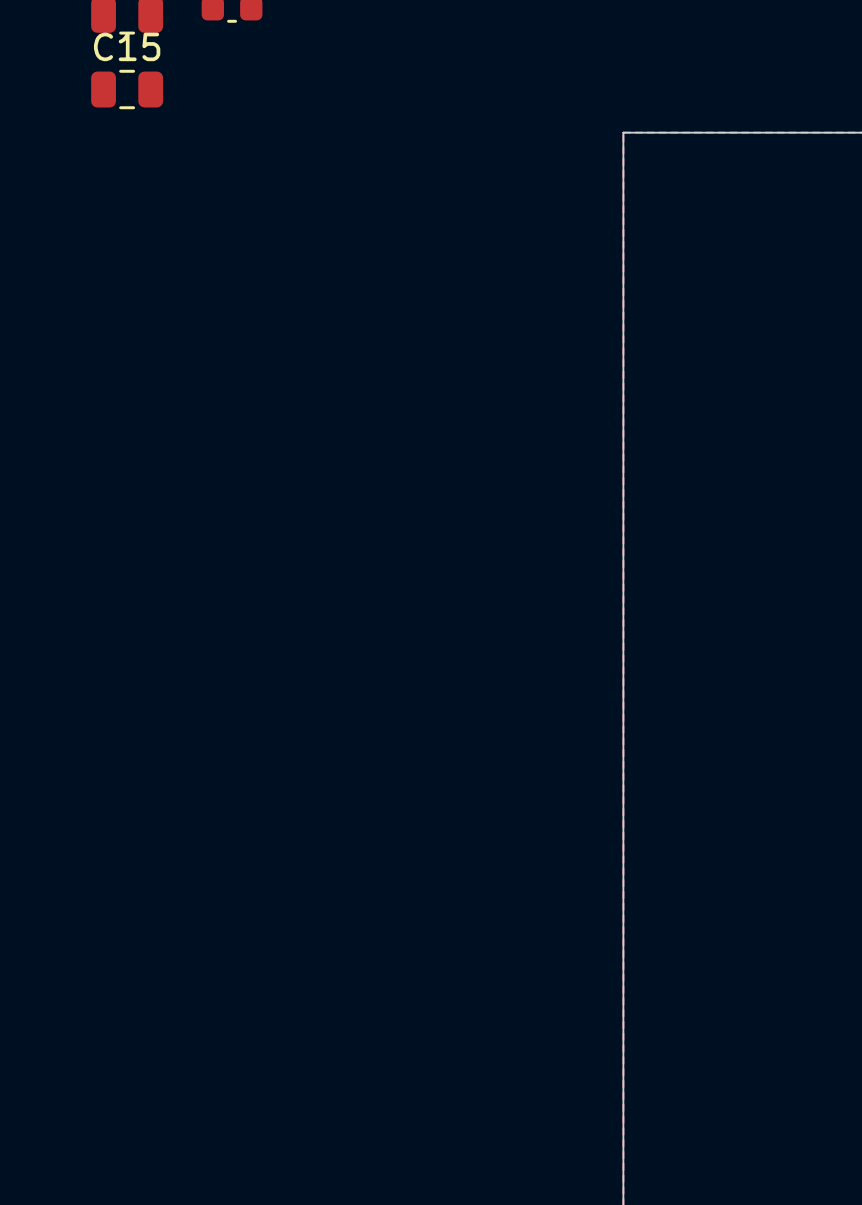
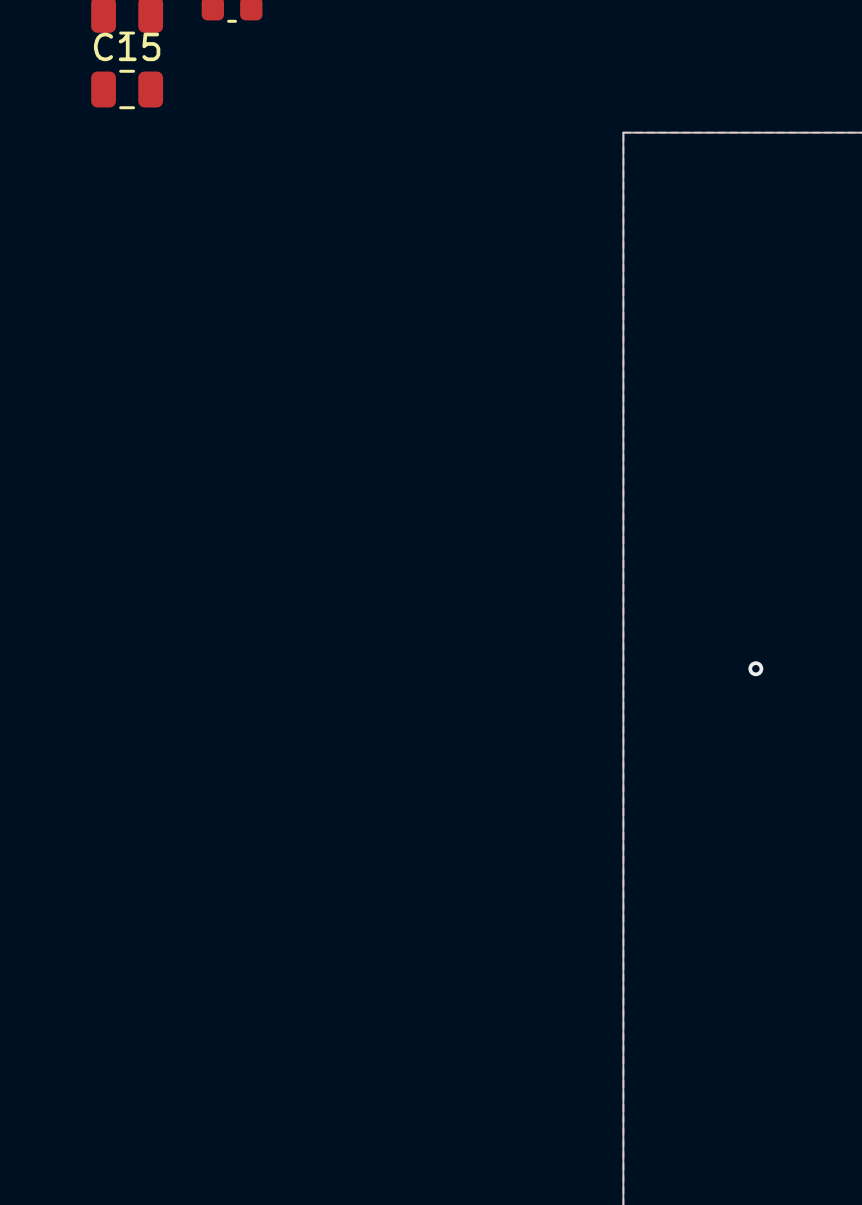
via: none -> (755, 668)

